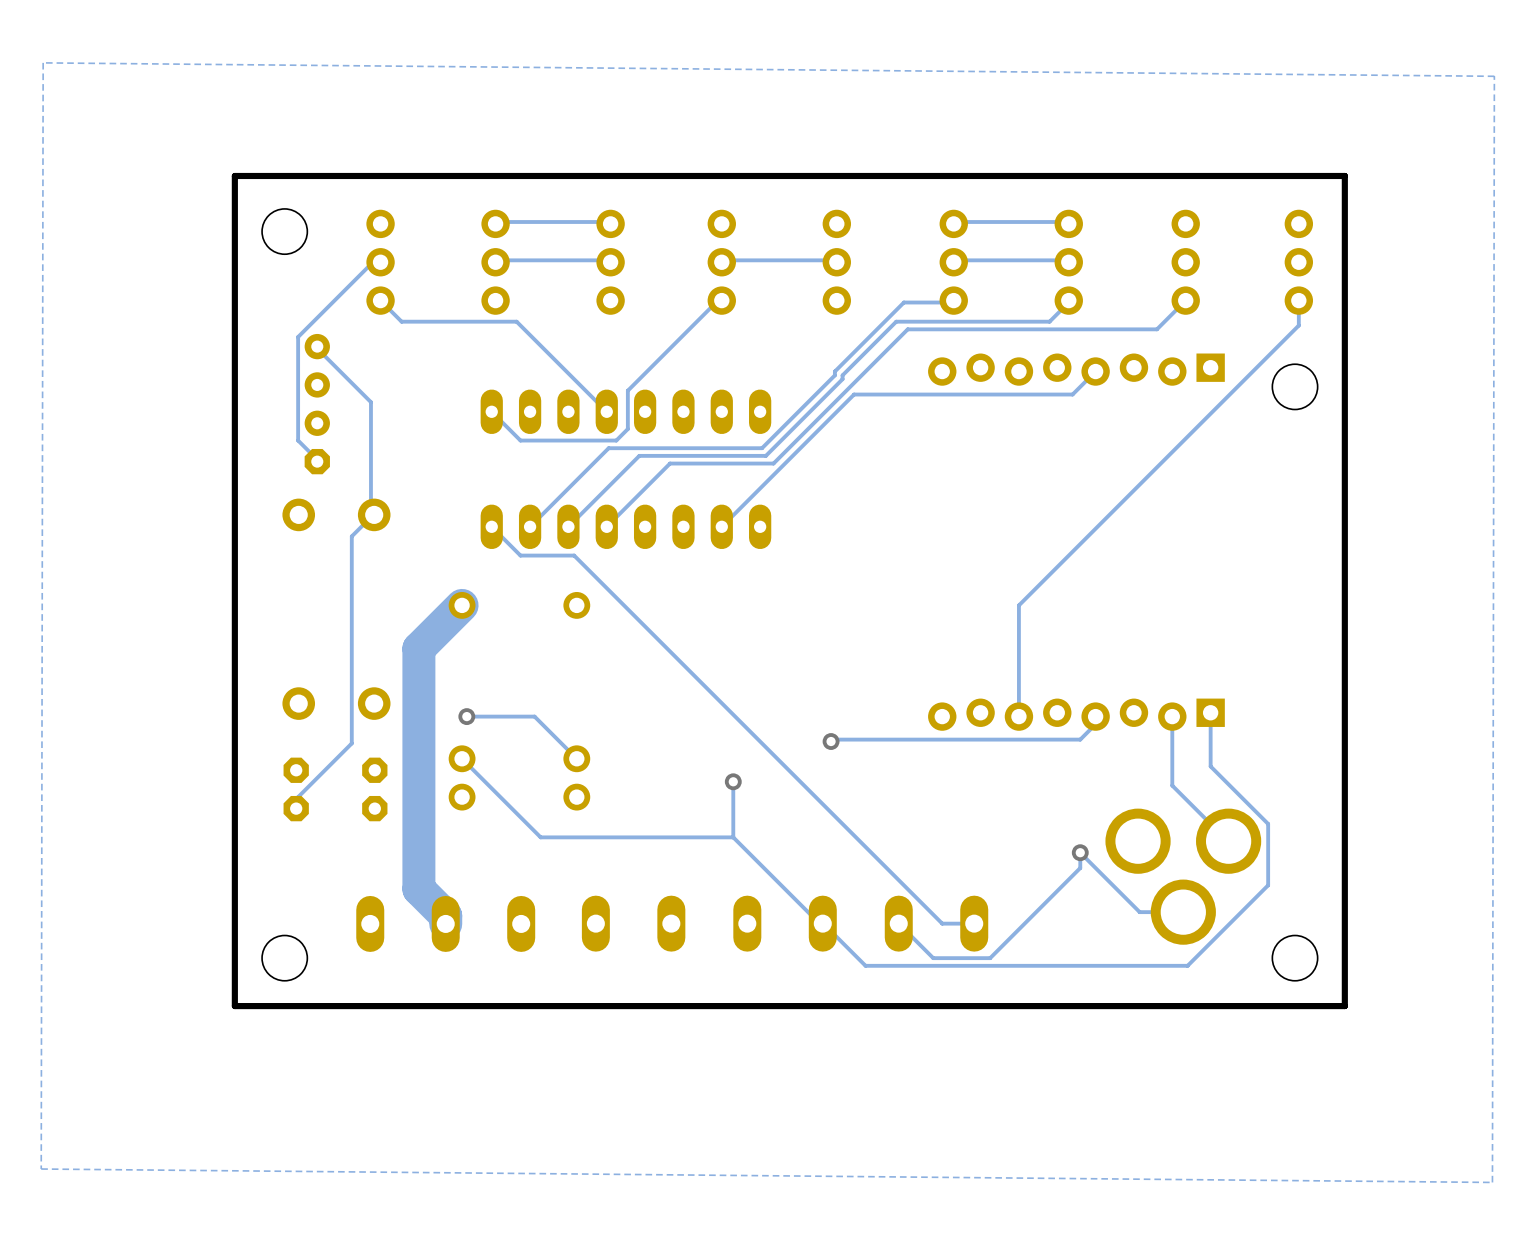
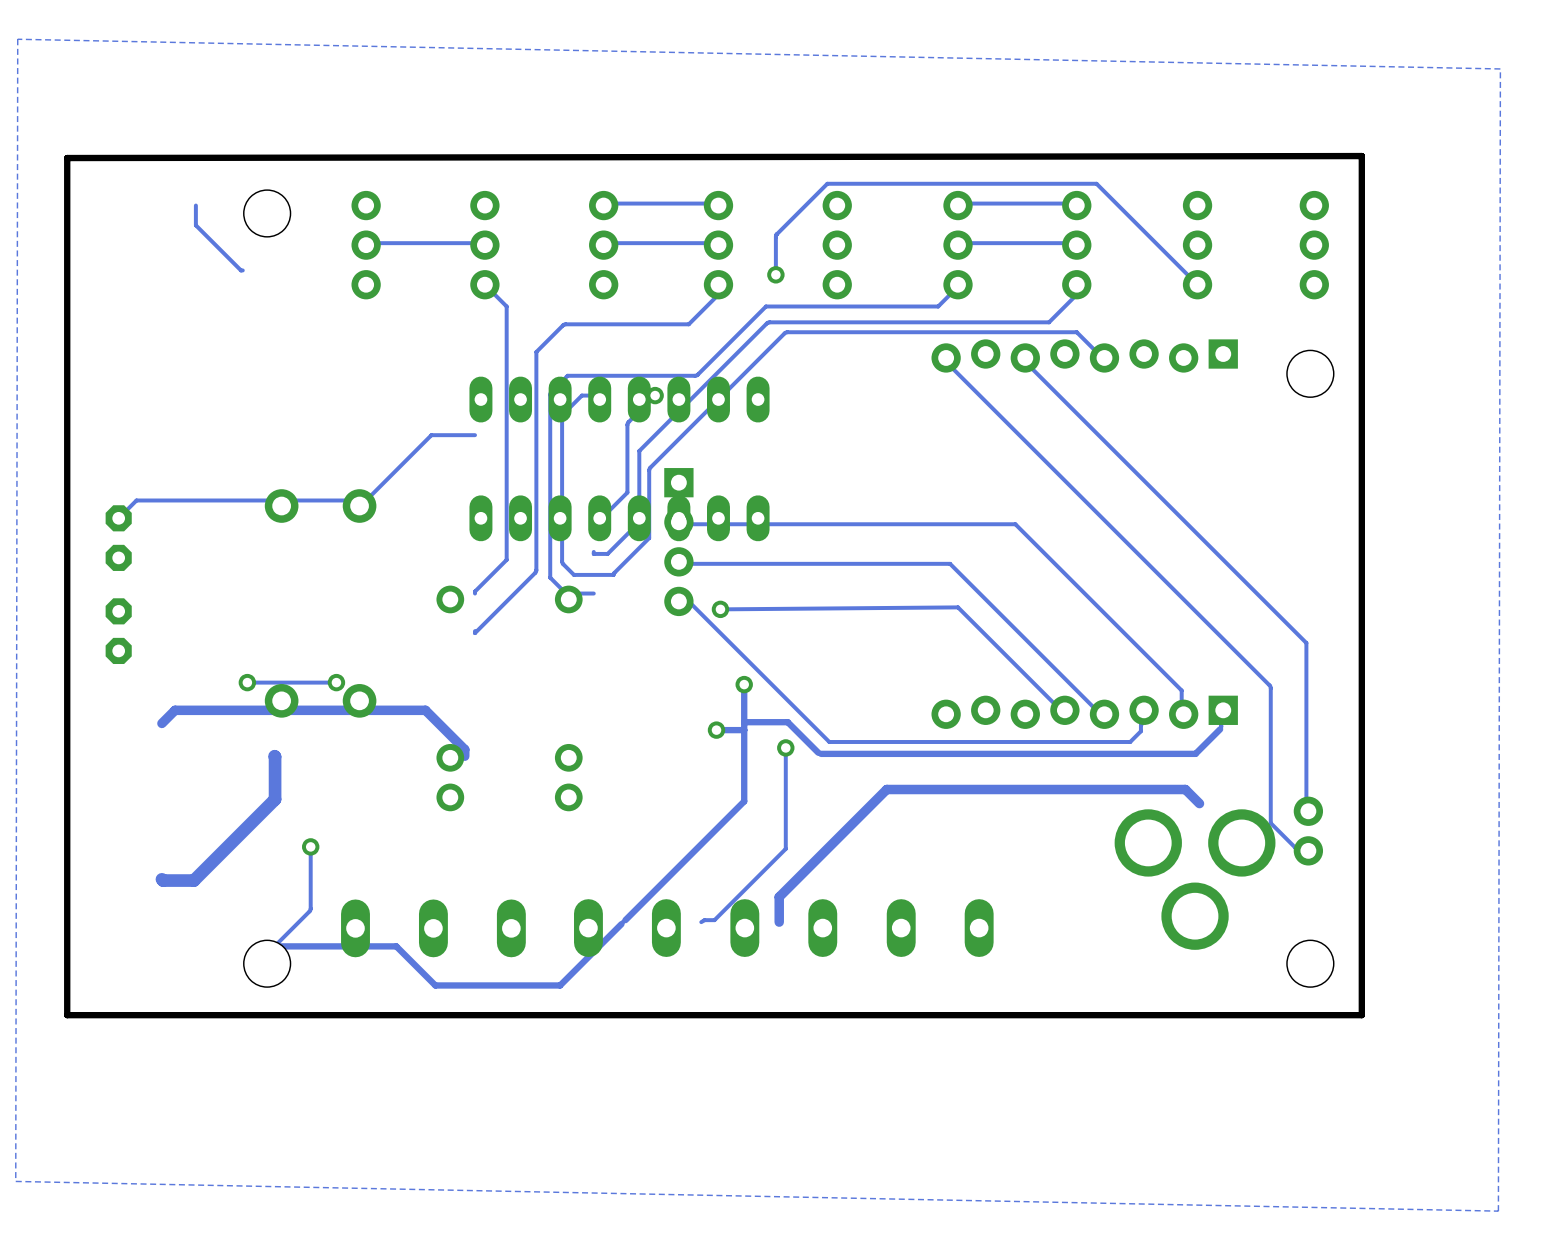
zone outline: (43, 62) (1494, 76) (1492, 1182) (41, 1169) -> (17, 39) (1500, 68) (1498, 1211) (15, 1181)
board edge: (1344, 175) (234, 175) (234, 1006) (1344, 1006) -> (1361, 156) (67, 158) (67, 1015) (1361, 1015) (1361, 1013)
track: none -> (195, 205) (195, 225) (242, 270)
track: (610, 223) (608, 221) (497, 221) (495, 223) -> (603, 205) (605, 203) (716, 203) (718, 205)
track: none -> (777, 234) (775, 274)
track: none -> (775, 235) (827, 183) (1096, 183) (1197, 284)
track: (380, 262) (378, 264) (370, 264) (298, 337) (298, 440) (317, 461) -> (366, 245) (368, 243) (482, 243) (484, 245)
track: (610, 262) (608, 260) (497, 260) (495, 262) -> (603, 245) (605, 243) (716, 243) (718, 245)
track: (836, 262) (834, 260) (723, 260) (721, 262) -> none
via: none -> (775, 274)
track: (380, 300) (401, 321) (516, 321) (606, 411) -> none
track: none -> (484, 284) (506, 306) (506, 559) (475, 593)
track: (721, 300) (719, 298) (627, 390) (627, 429) (616, 440) (520, 440) (491, 411) -> (718, 284) (717, 295) (688, 324) (565, 324) (536, 352) (536, 571) (475, 633) (475, 631)
track: (1185, 300) (1156, 329) (907, 329) (773, 463) (670, 463) -> (1102, 359) (1076, 332) (786, 332) (665, 452)
track: (1298, 300) (1298, 325) (1018, 605) (1018, 716) -> none
track: (953, 302) (903, 302) (762, 448) (608, 448) (530, 526) -> none
track: (1068, 302) (1049, 321) (934, 321) -> (958, 286) (938, 306)
track: none -> (1076, 286) (1075, 295) (1049, 322) (767, 322) (639, 451) (639, 522) (607, 553) (593, 553) (593, 551)
track: (896, 321) (842, 375) (842, 379) (765, 455) (639, 455) (568, 526) -> (898, 306) (765, 306) (696, 375) (567, 375) (550, 394) (550, 577) (566, 593) (593, 593)
track: (317, 346) (370, 402) (370, 513) (374, 514) (351, 536) (351, 743) (298, 797) (298, 808) (296, 808) -> none
track: (1095, 371) (1072, 394) (854, 394) (721, 526) -> none
track: none -> (944, 359) (1269, 685) (1270, 823) (1295, 848) (1306, 848) (1308, 850)
track: none -> (1023, 359) (1306, 643) (1306, 809) (1308, 811)
part: (317, 404) -> none
track: none -> (655, 395) (627, 423) (627, 492) (605, 513) (593, 514)
via: none -> (655, 395)
track: none -> (475, 435) (431, 435) (366, 500) (136, 500) (118, 518)
track: (655, 477) (606, 526) -> (650, 467) (649, 538) (613, 574) (573, 574) (562, 561) (562, 416) (581, 395) (593, 395)
track: (491, 526) (520, 555) (574, 555) (942, 923) (974, 923) -> none
track: none -> (678, 522) (680, 524) (1015, 524) (1181, 690) (1181, 716)
part: none -> (118, 538)
part: none -> (678, 542)
track: none -> (678, 561) (680, 563) (950, 563) (1102, 716)
track: (462, 605) (418, 648) (418, 889) (445, 915) (445, 923) -> none
track: none -> (678, 601) (688, 601) (829, 741) (1130, 741) (1140, 731) (1142, 712)
track: none -> (720, 609) (958, 607) (1062, 712)
via: none -> (720, 609)
part: none -> (118, 631)
via: none -> (247, 682)
track: none -> (336, 682) (247, 682)
via: none -> (336, 682)
track: none -> (744, 684) (744, 801) (560, 985) (435, 985) (396, 946) (274, 946) (310, 910) (310, 846)
via: none -> (744, 684)
track: (1210, 712) (1210, 766) (1268, 823) (1268, 885) (1187, 965) (865, 965) (823, 923) (819, 923) (733, 837) -> none
track: none -> (1221, 712) (1220, 728) (1195, 753) (820, 753) (787, 722) (744, 722)
track: (466, 716) (534, 716) (576, 758) -> none
via: (466, 716) -> none
track: (1095, 716) (1095, 724) (1080, 739) (832, 739) (831, 741) -> none
track: (1172, 716) (1172, 785) (1228, 841) -> none
track: none -> (161, 723) (175, 710) (425, 710) (464, 749) (464, 756)
via: none -> (716, 730)
track: none -> (744, 730) (716, 730)
via: (831, 741) -> none
track: none -> (785, 747) (785, 848) (714, 920) (701, 922)
via: none -> (785, 747)
track: none -> (274, 756) (275, 799) (193, 880) (161, 879)
track: (462, 758) (540, 837) (733, 837) -> none
track: (733, 781) (733, 837) -> none
via: (733, 781) -> none
part: (296, 789) -> none
part: (374, 789) -> none
track: none -> (1199, 803) (1185, 789) (886, 789) (779, 897) (779, 922)
part: none -> (1308, 831)
via: none -> (310, 846)
via: (1080, 852) -> none
track: (1183, 912) (1139, 912) (1080, 852) (1080, 868) (990, 958) (933, 958) (898, 923) -> none

